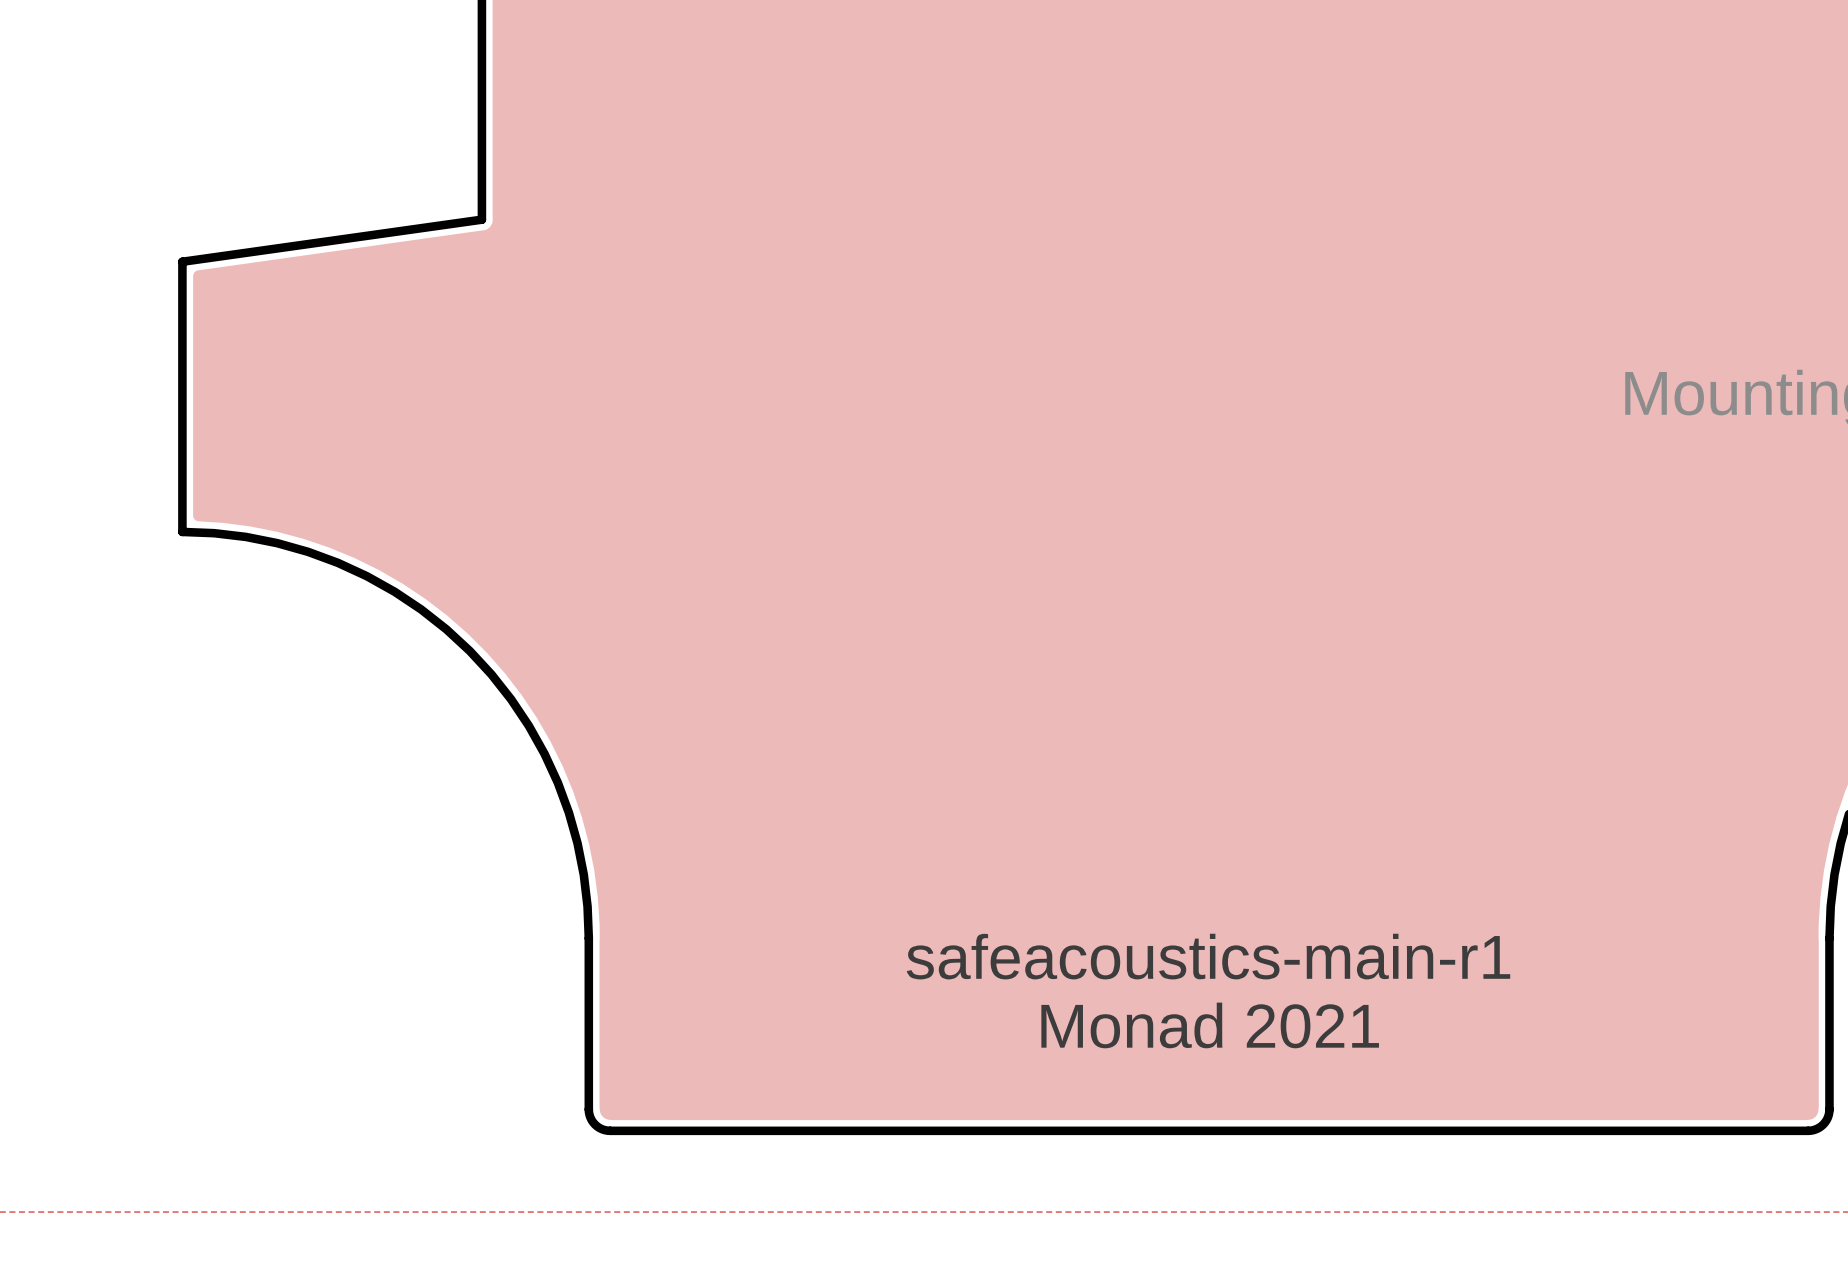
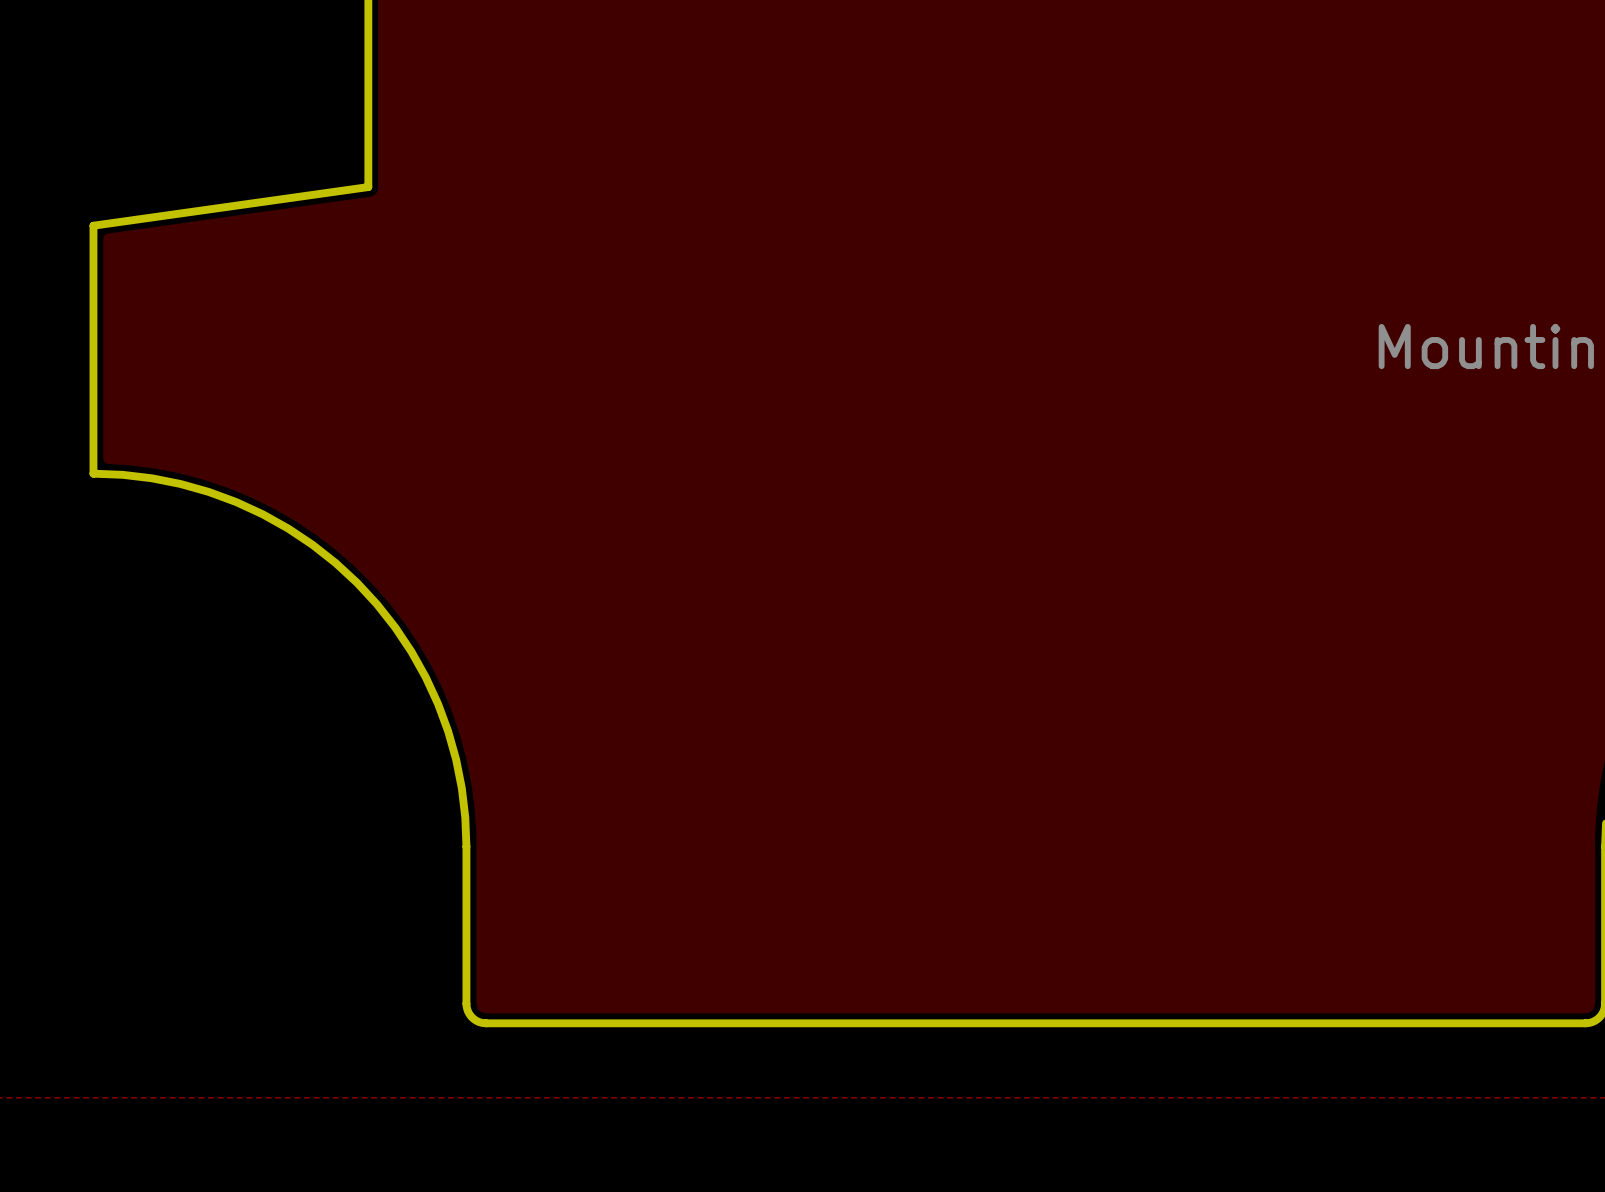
text: safeacoustics-main-r1 (1208, 956) -> none
text: Monad 2021 (1210, 1025) -> none

